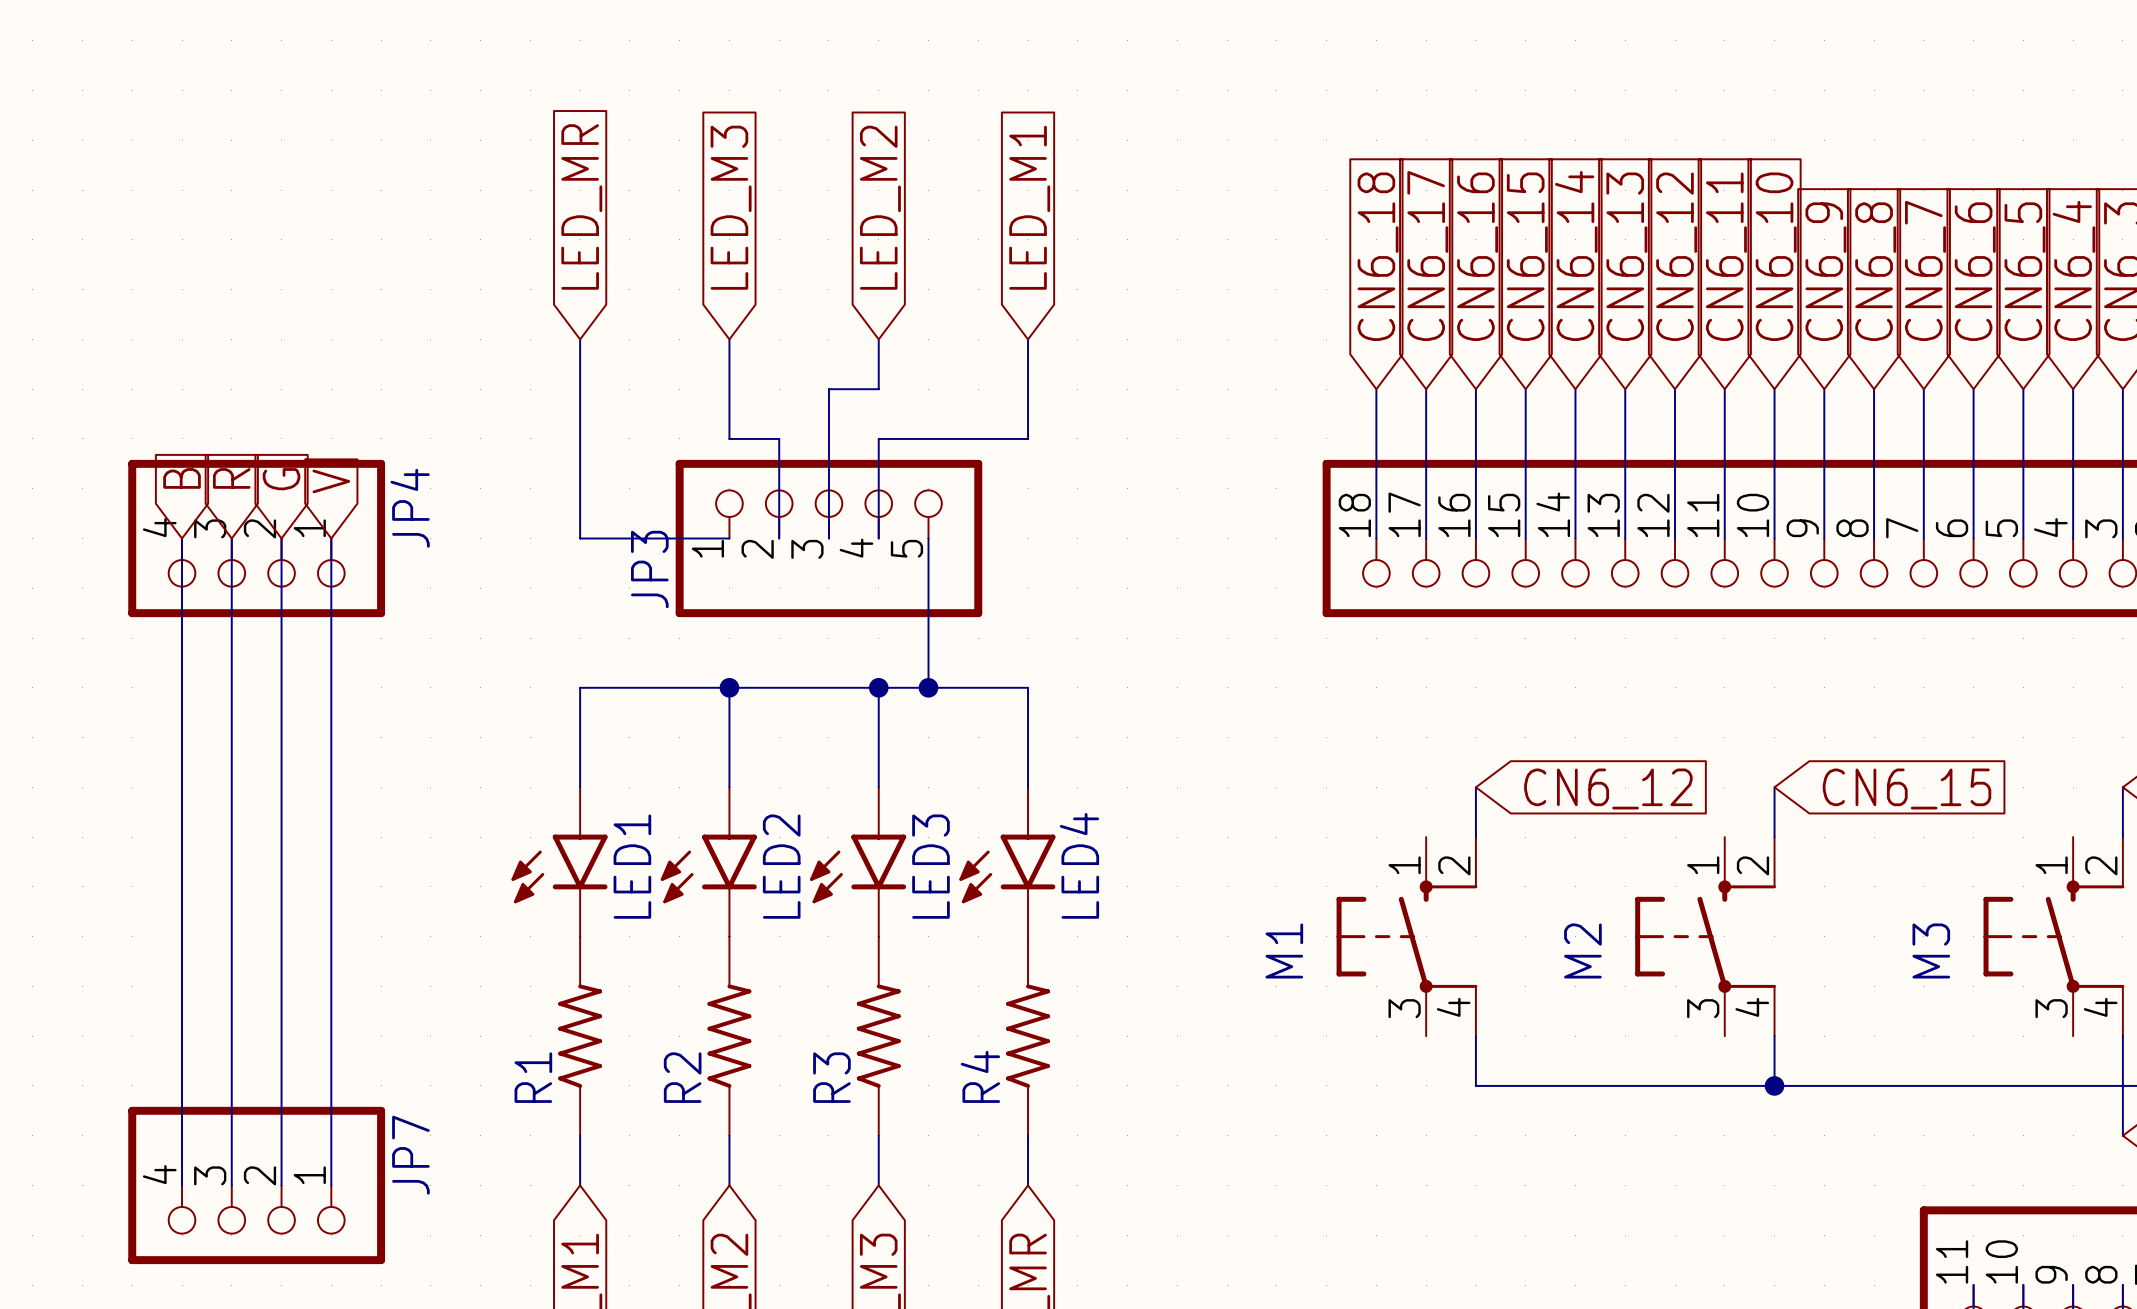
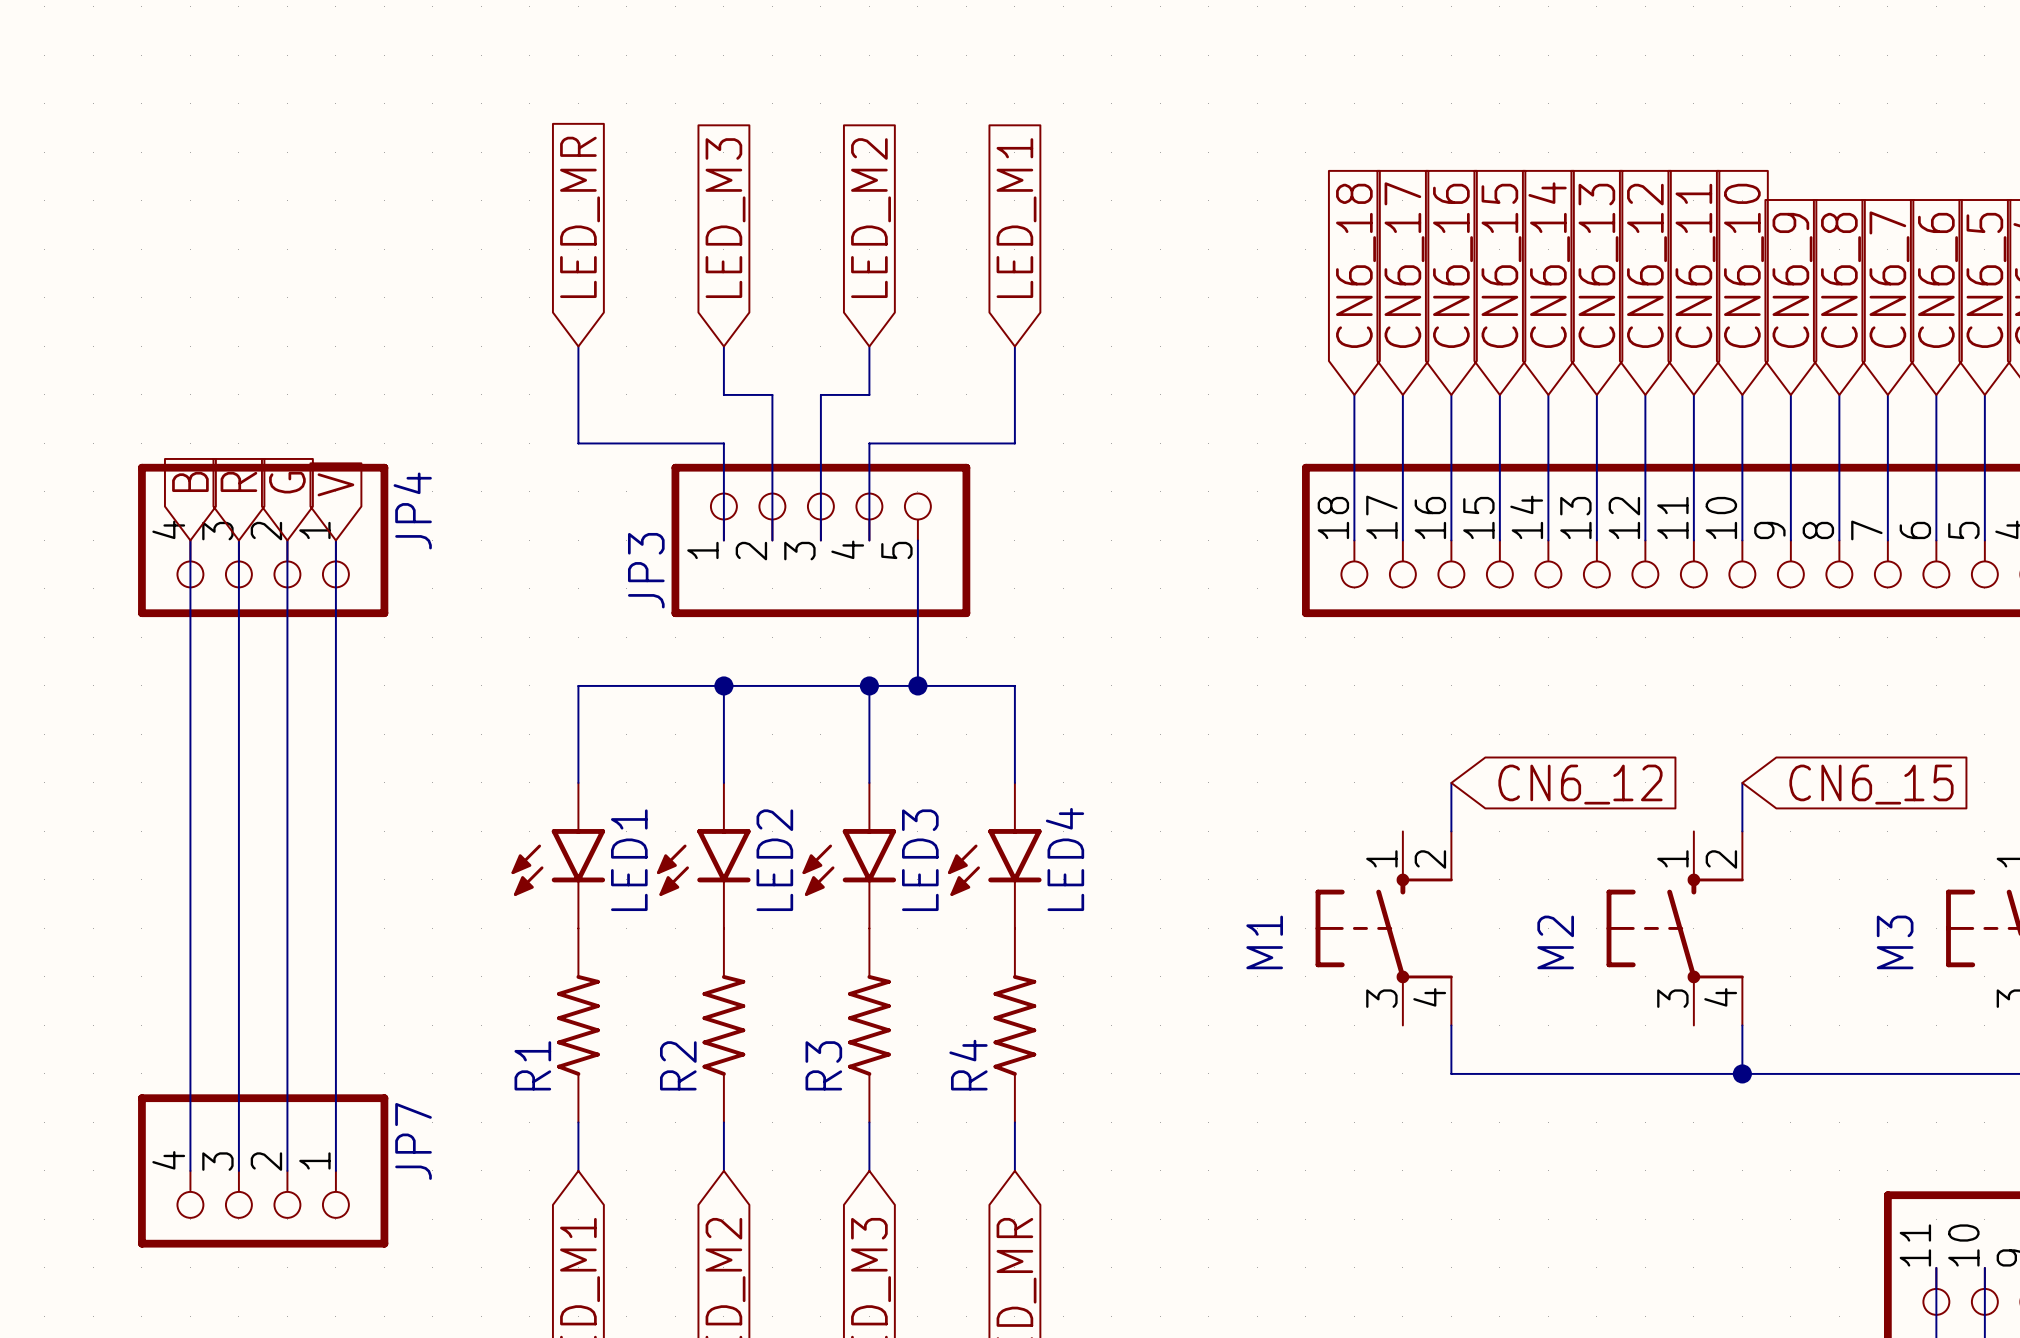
wire: (729, 389) (729, 438) (779, 438) -> (723, 394) (772, 394) (772, 443)
wire: (580, 438) (580, 538) (729, 538) -> (578, 443) (723, 443) (723, 540)

